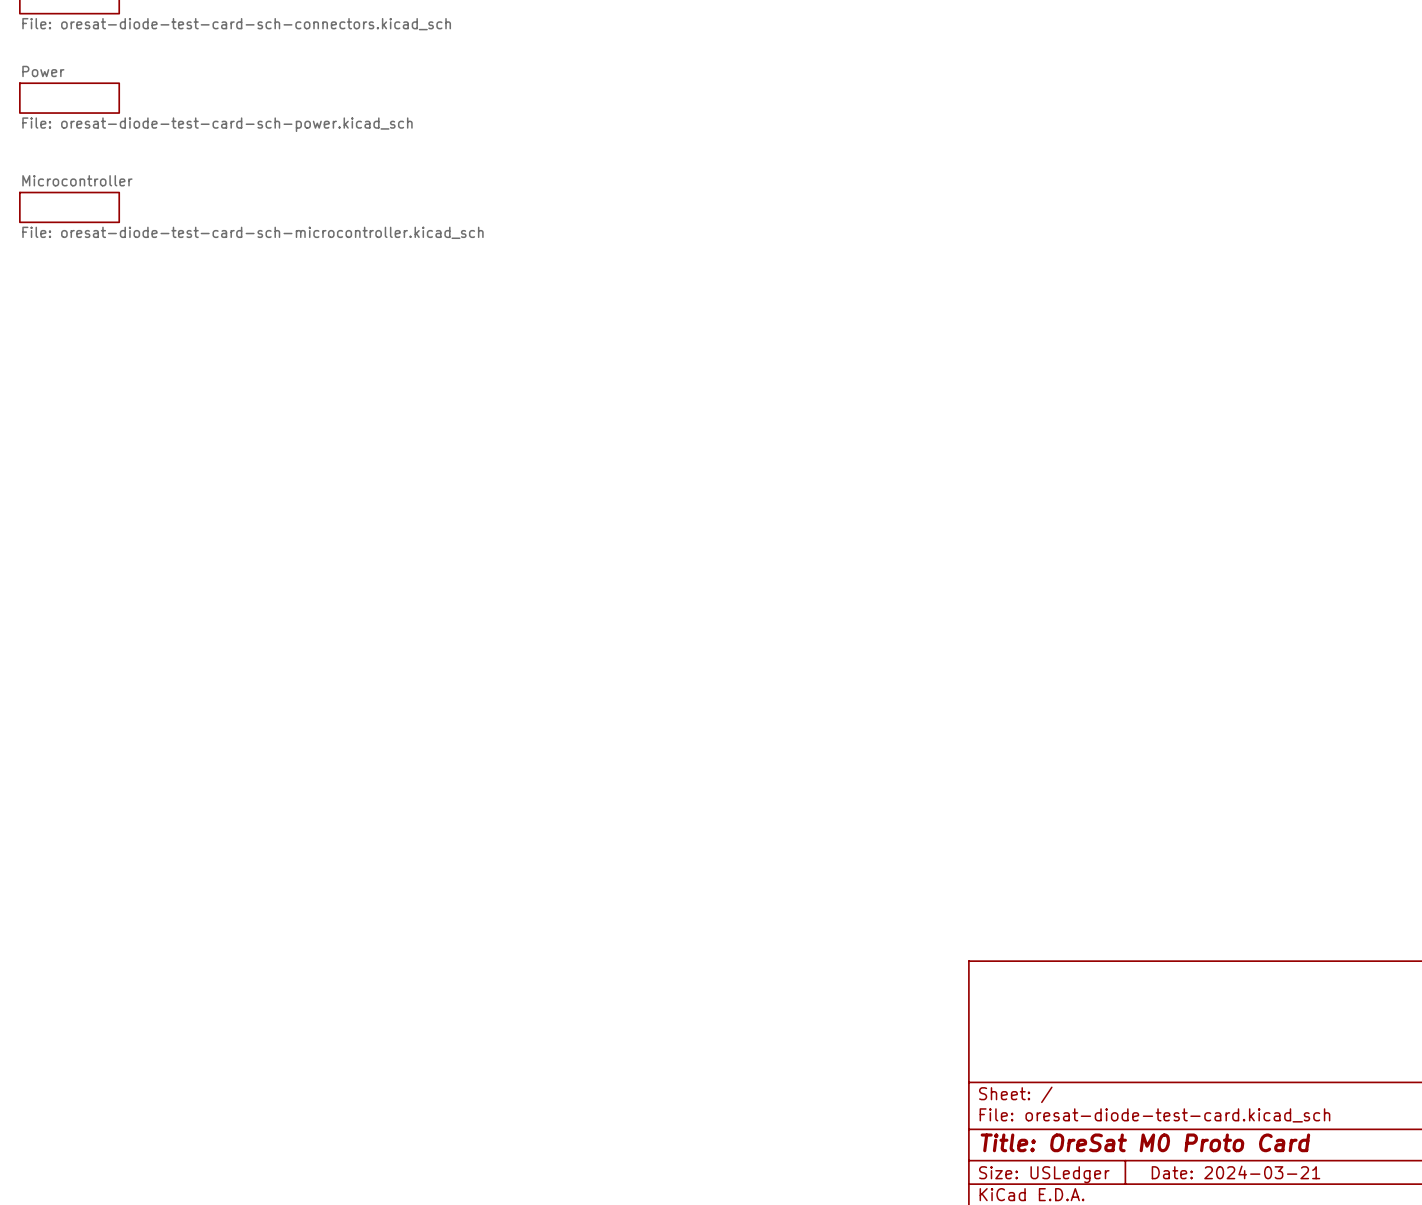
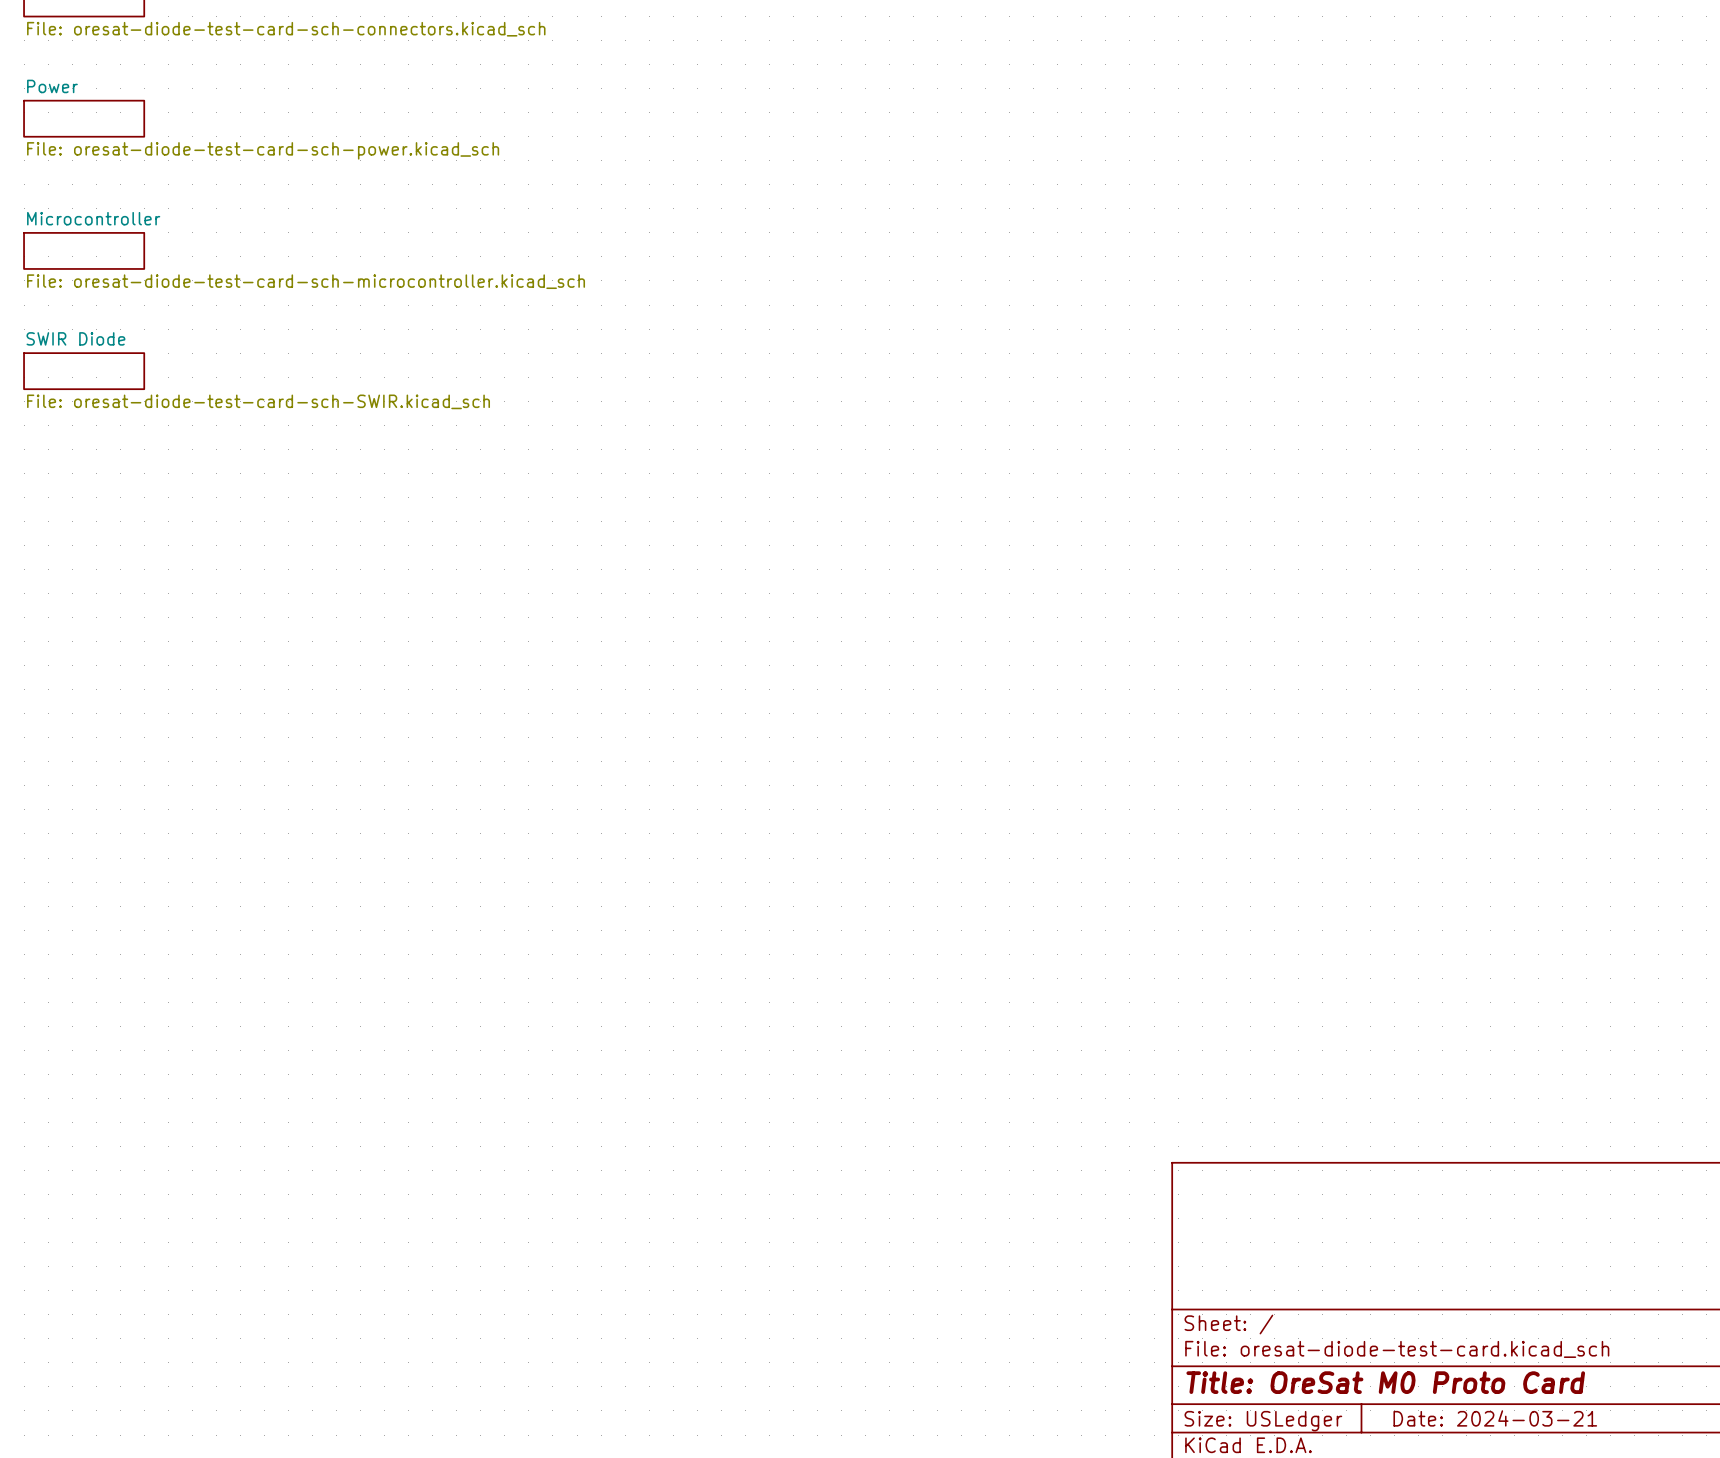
sheet SWIR Diode: none -> File: oresat-diode-test-card-sch-SWIR.kicad_sch (84, 371)

